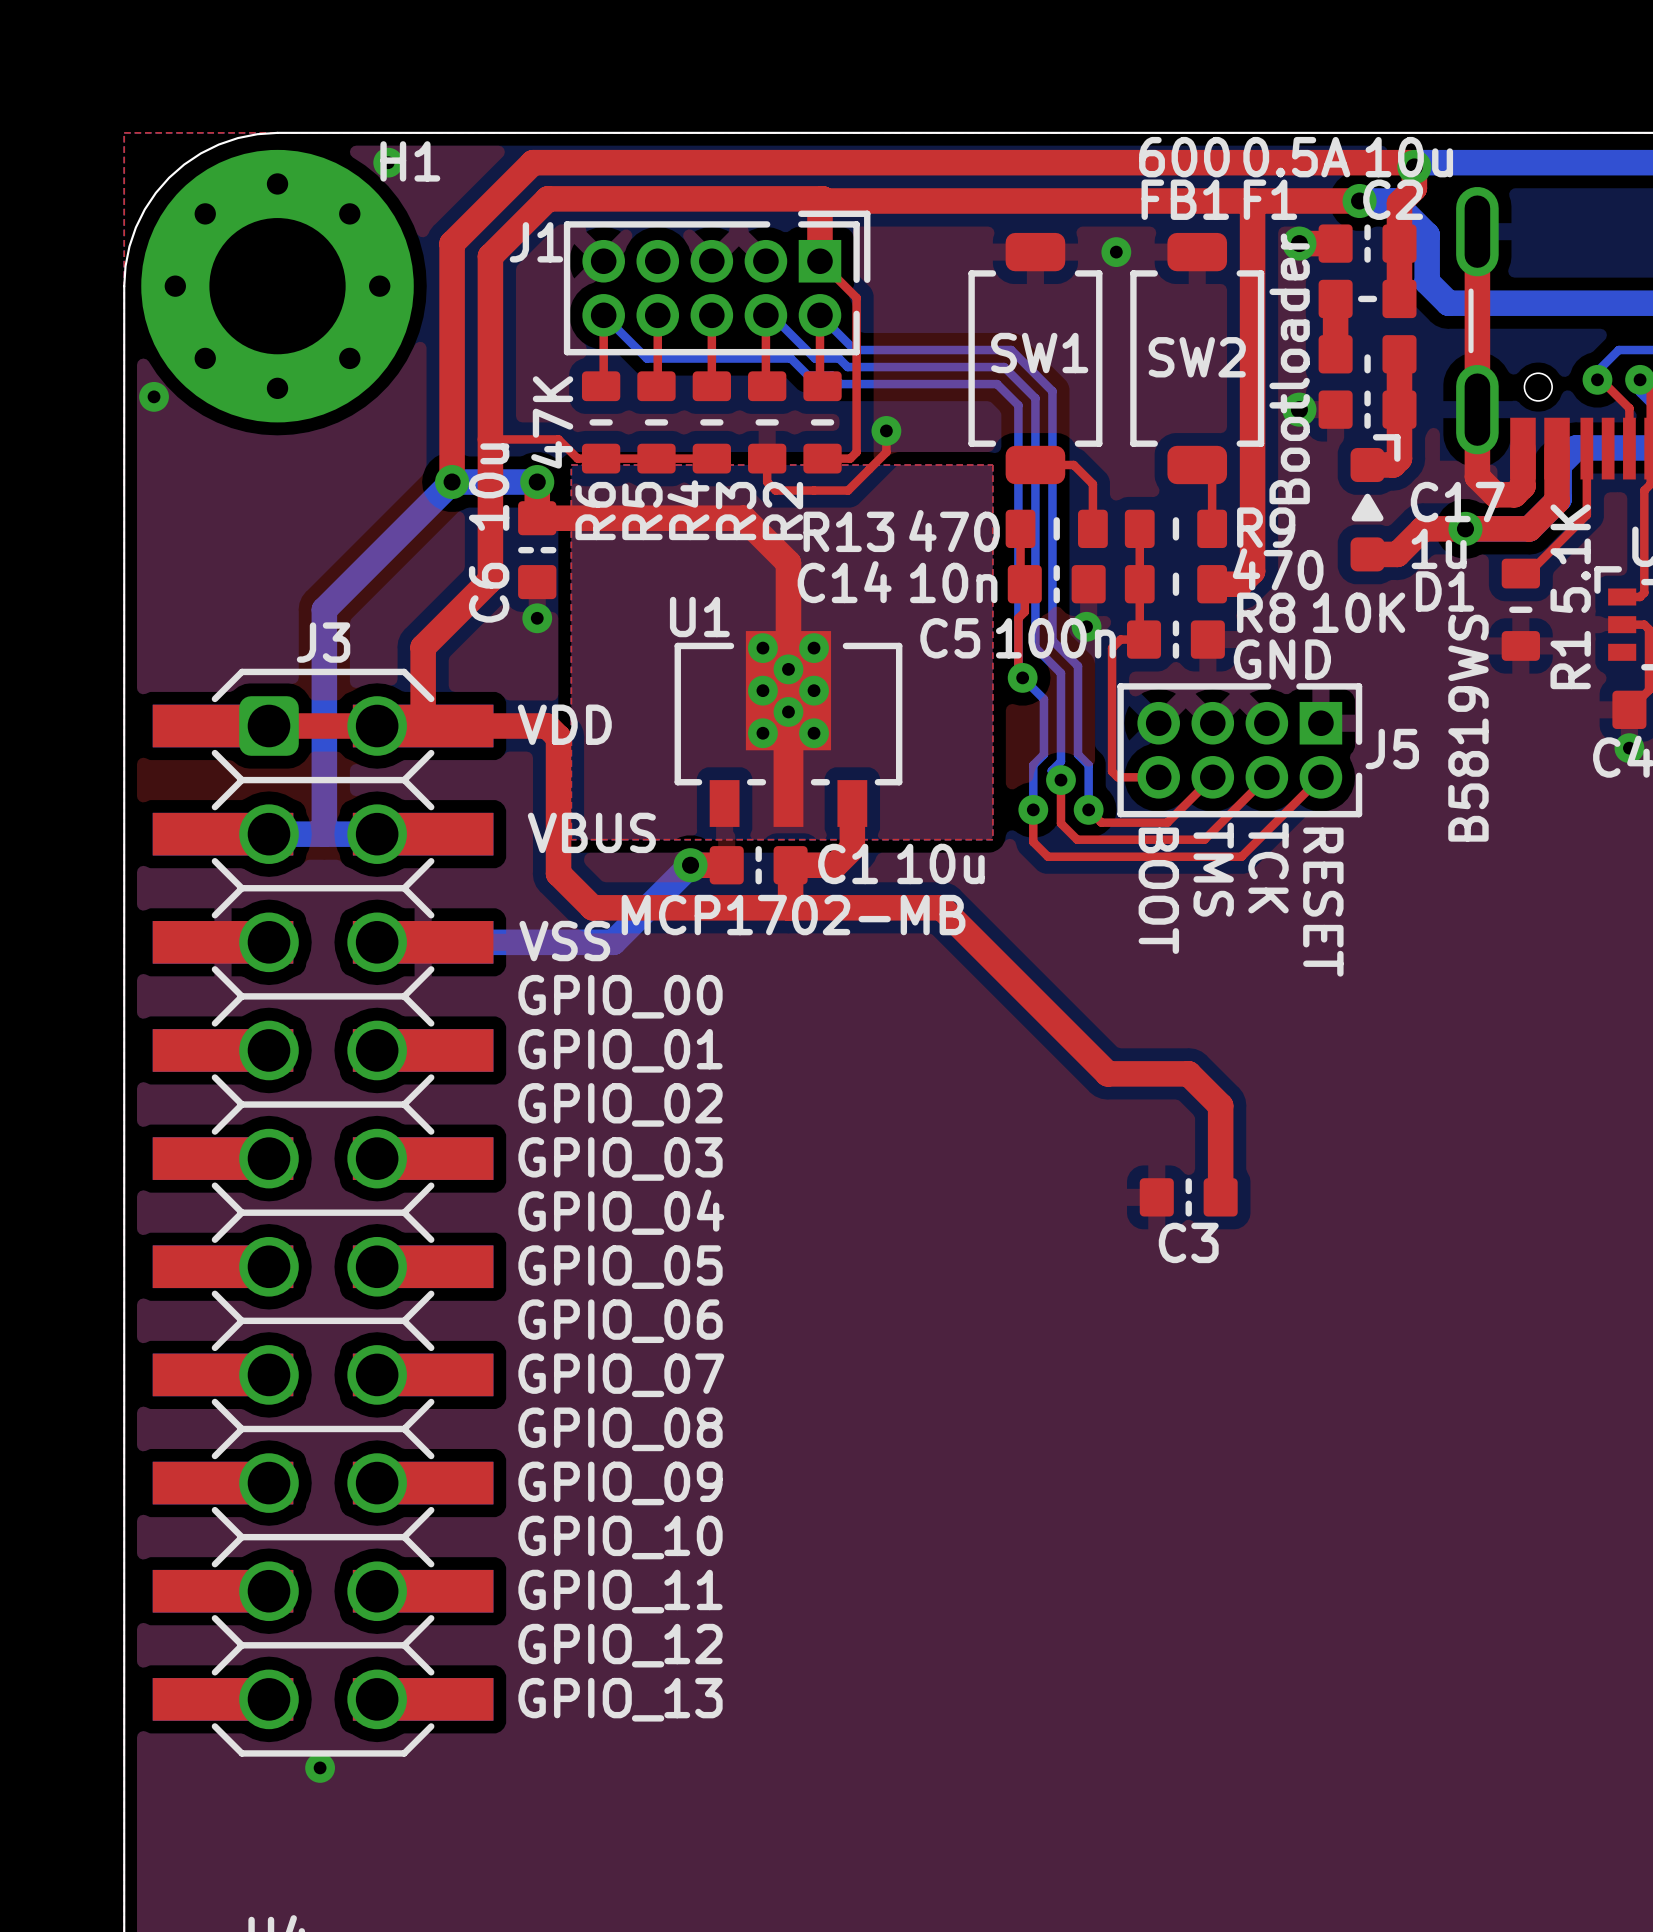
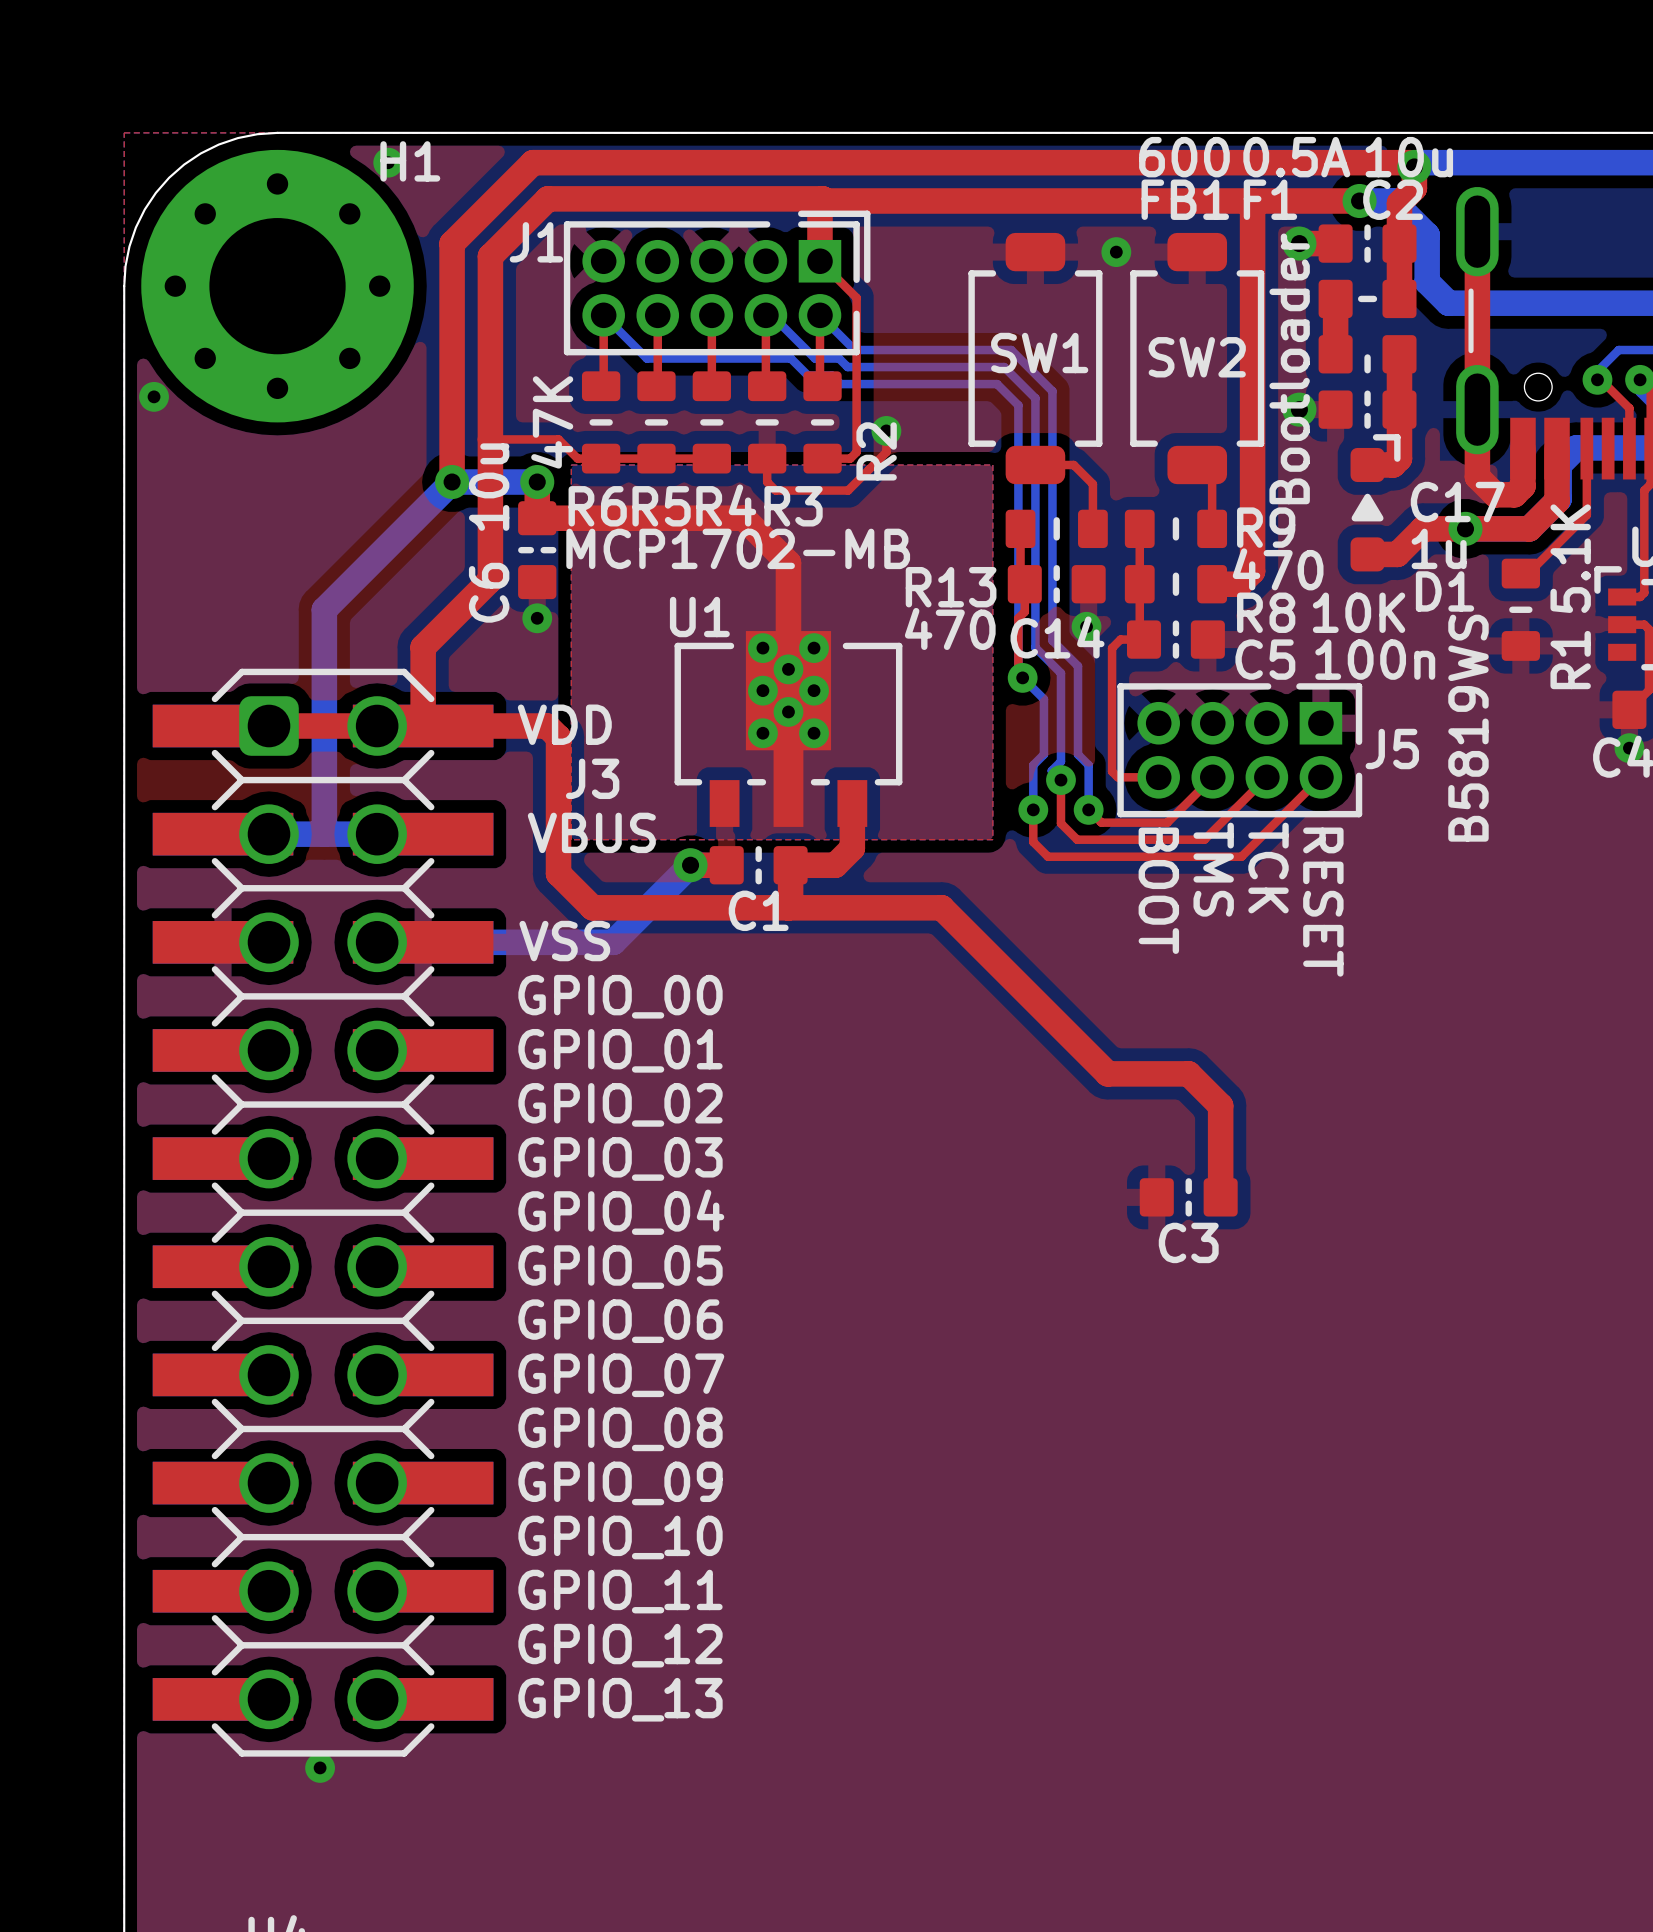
R4 name rotation: 0° (688, 510) -> 90° clockwise (726, 505)
R6 name rotation: 0° (595, 511) -> 90° clockwise (597, 506)
R5 name rotation: 0° (642, 511) -> 90° clockwise (661, 506)
R3 name rotation: 0° (736, 511) -> 90° clockwise (793, 506)
R2 name position: R2 (782, 511) -> R2 (876, 451)
R13 name position: R13 (848, 531) -> R13 (951, 587)
R13 value position: 470 (954, 531) -> 470 (950, 628)
C14 name position: C14 (844, 582) -> C14 (1057, 637)
C14 value: 10n (953, 582) -> none
C5 name position: C5 (950, 638) -> C5 (1265, 659)
C5 value position: 100n (1055, 638) -> 100n (1375, 659)
J3 name position: J3 (323, 642) -> J3 (592, 778)
text: GND (1282, 659) -> none
C1 name position: C1 (848, 863) -> C1 (758, 910)
C1 value: 10u (940, 863) -> none
U1 value position: MCP1702-MB (793, 915) -> MCP1702-MB (738, 548)

